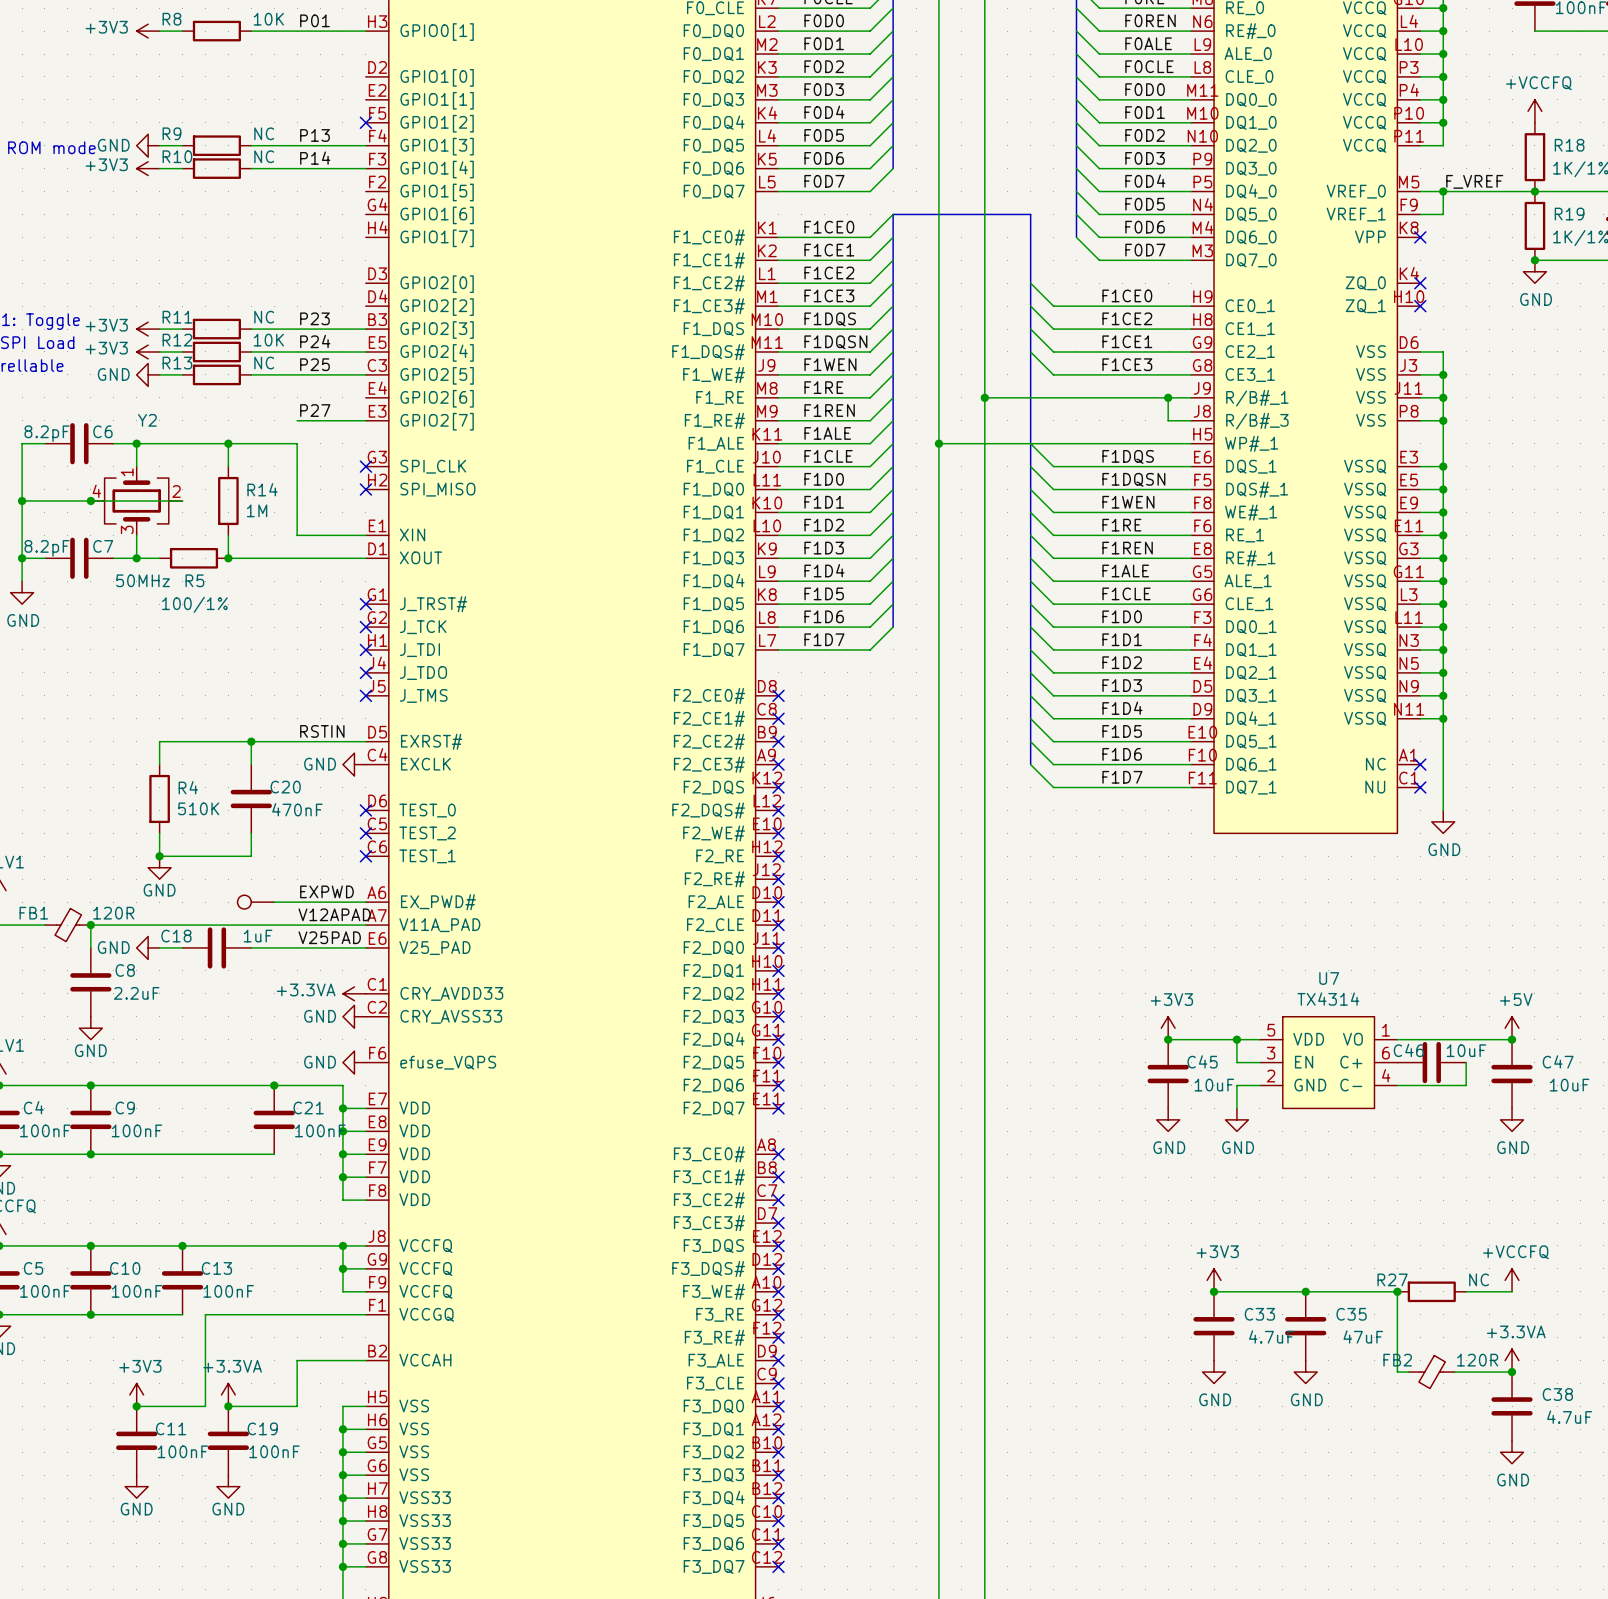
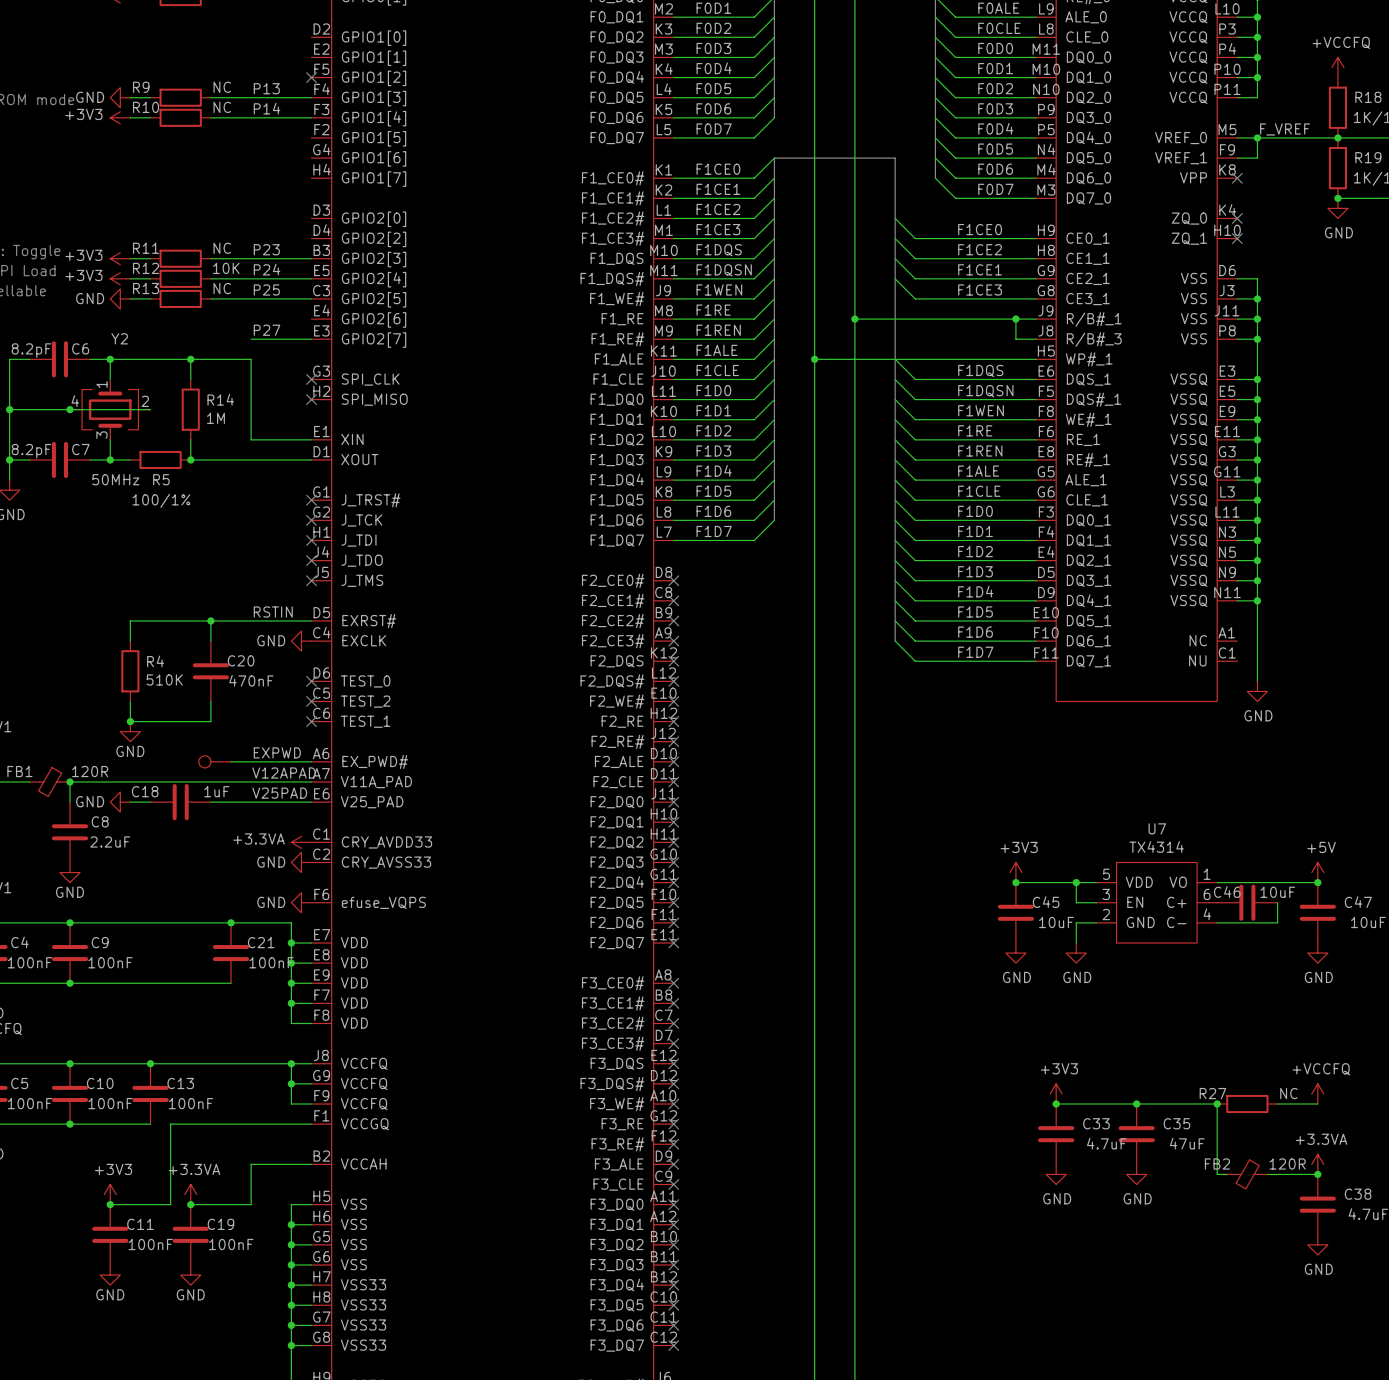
no-connect mark: (1420, 764) -> none
no-connect mark: (1420, 787) -> none

